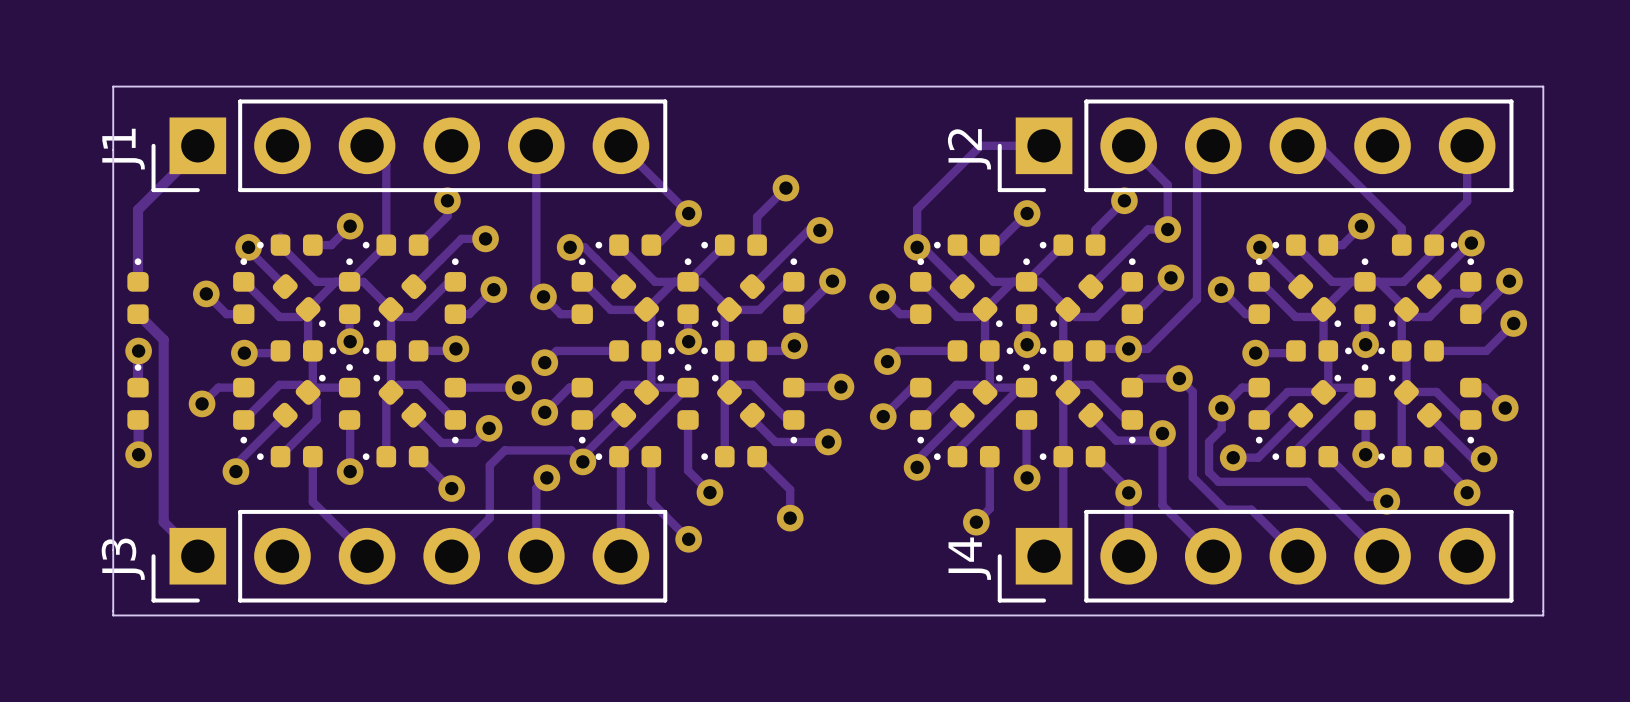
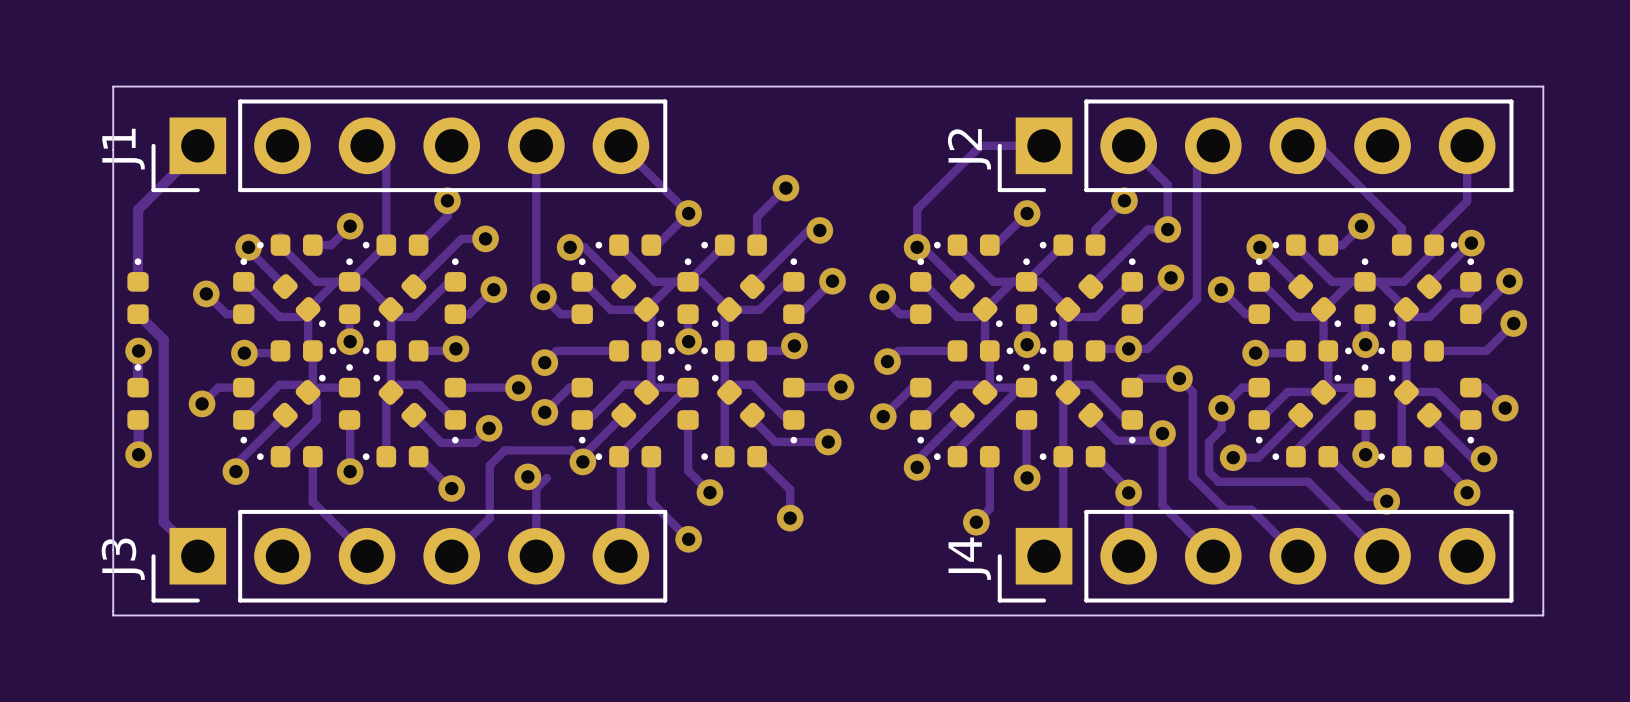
via position: (546, 477) -> (527, 476)

